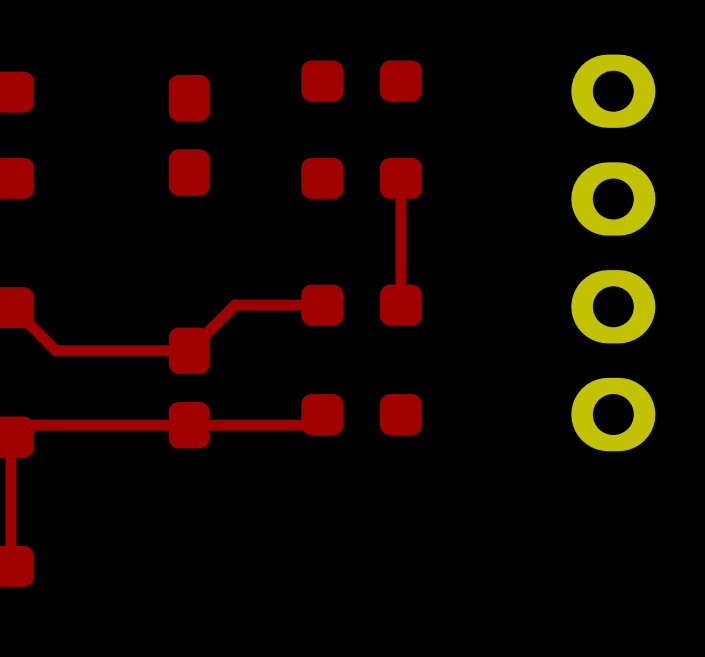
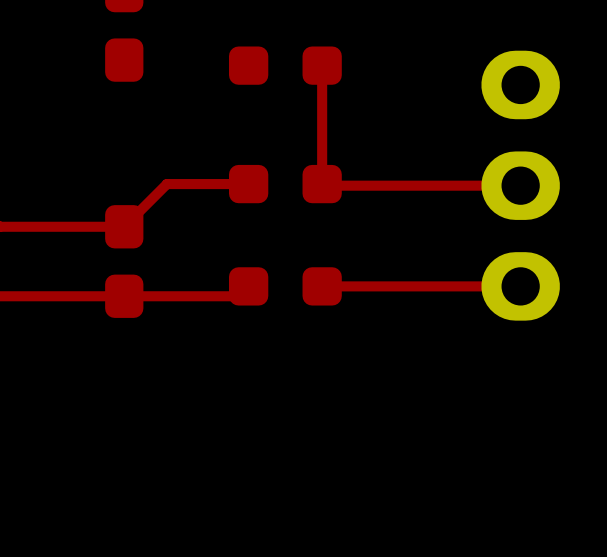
top track: none -> (322, 184) (323, 185) (520, 185)
top track: none -> (520, 286) (322, 286)

